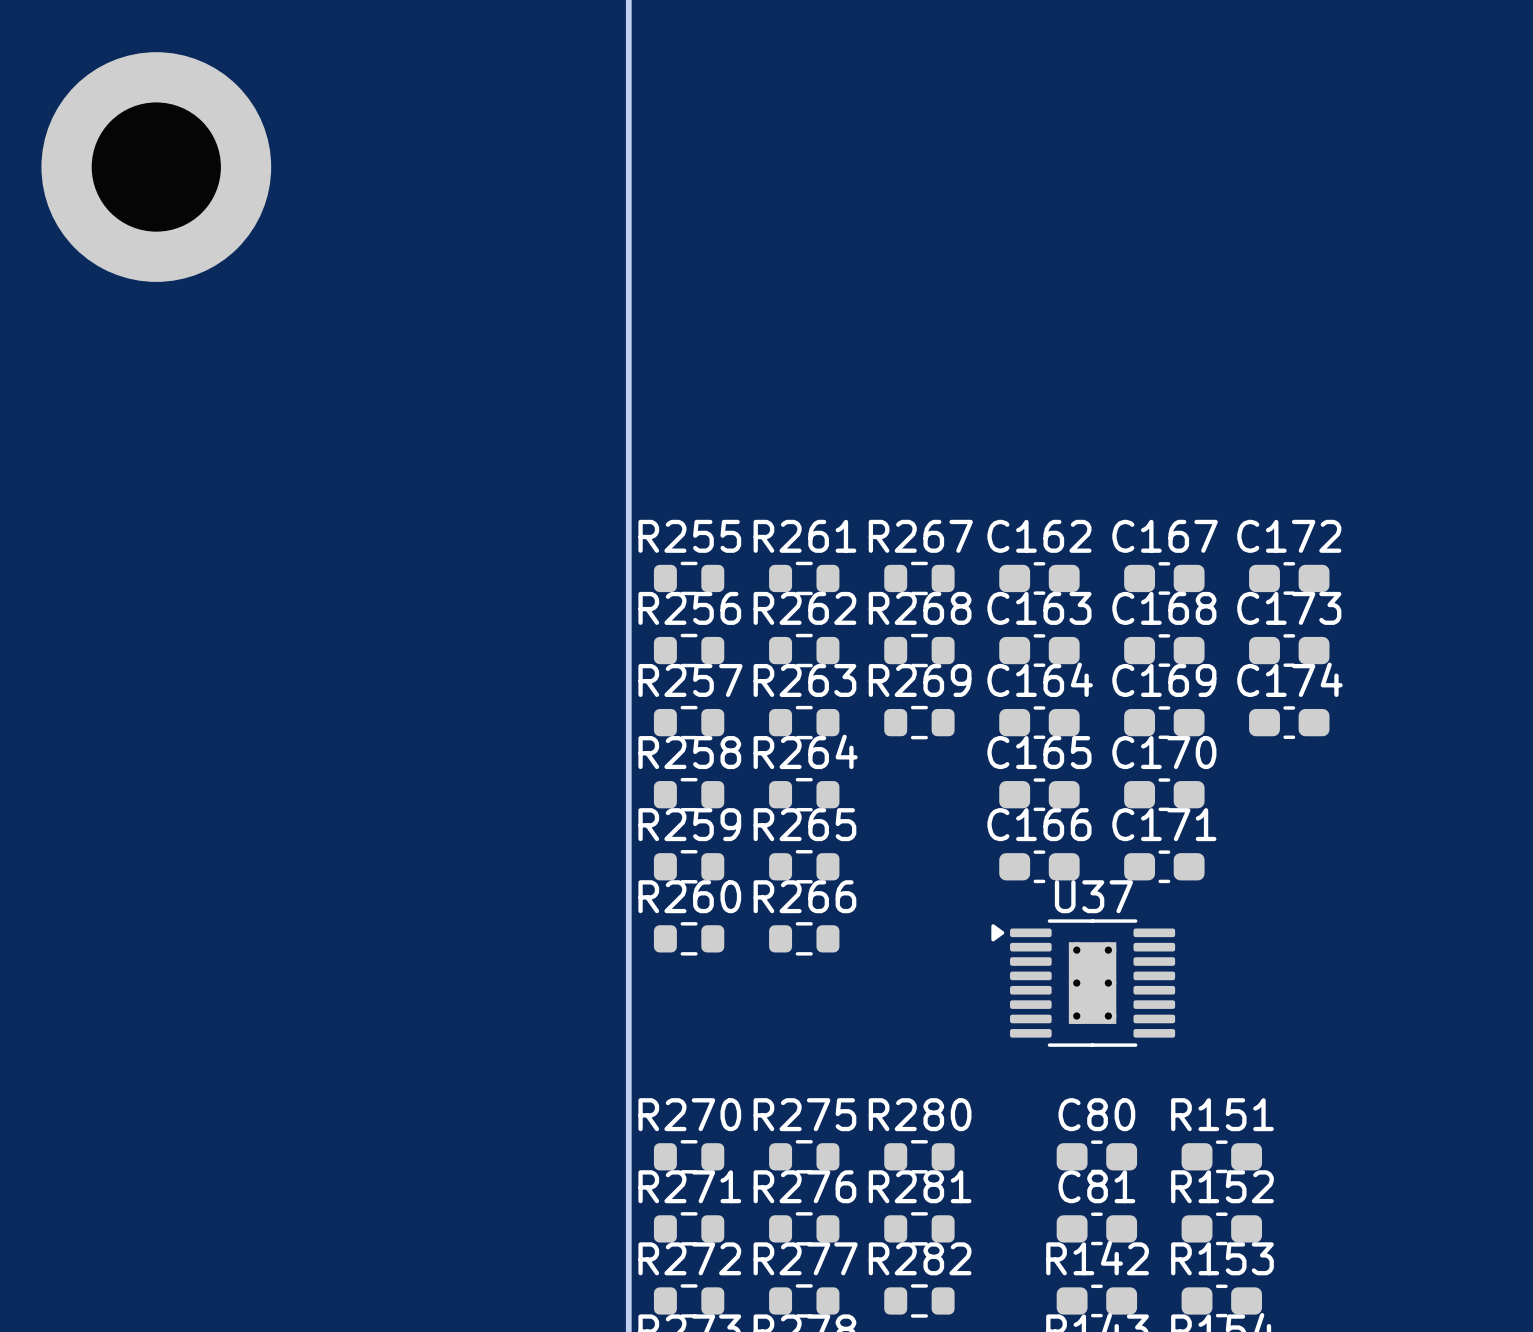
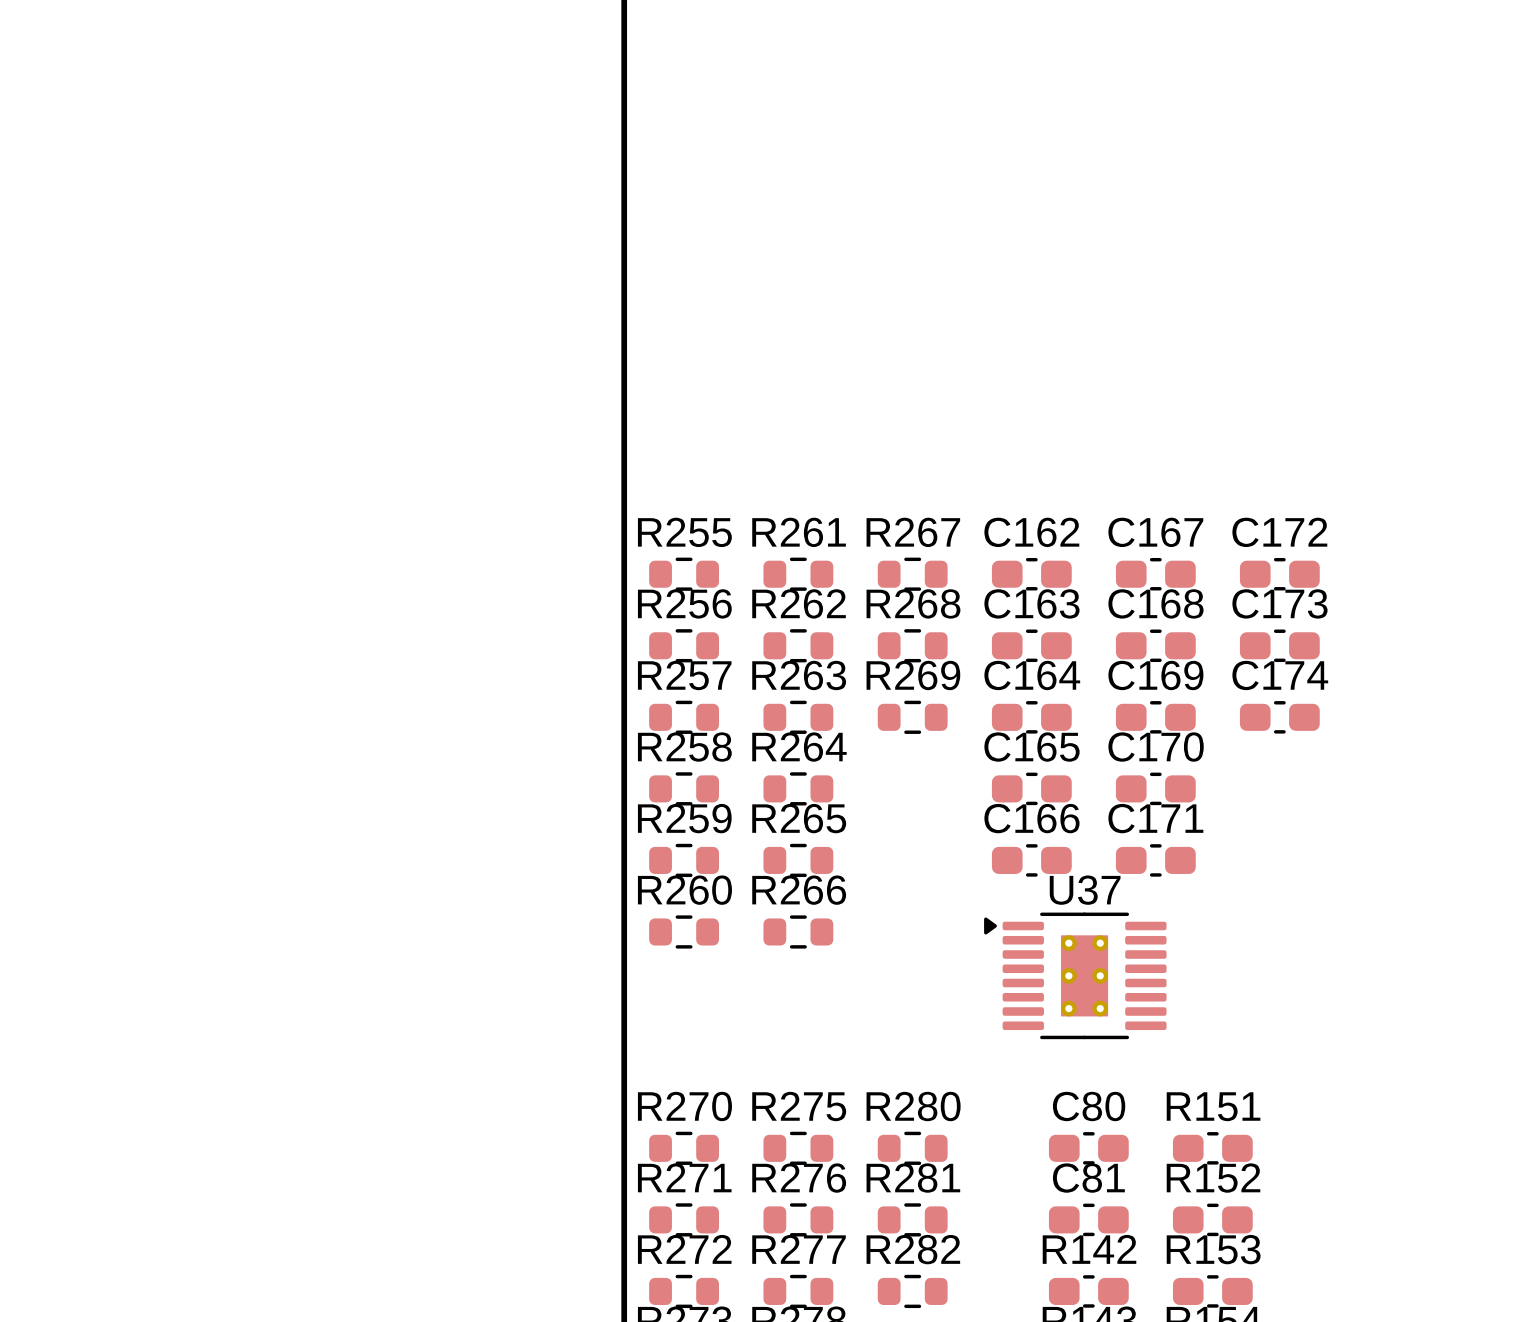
part: (156, 167) -> none

